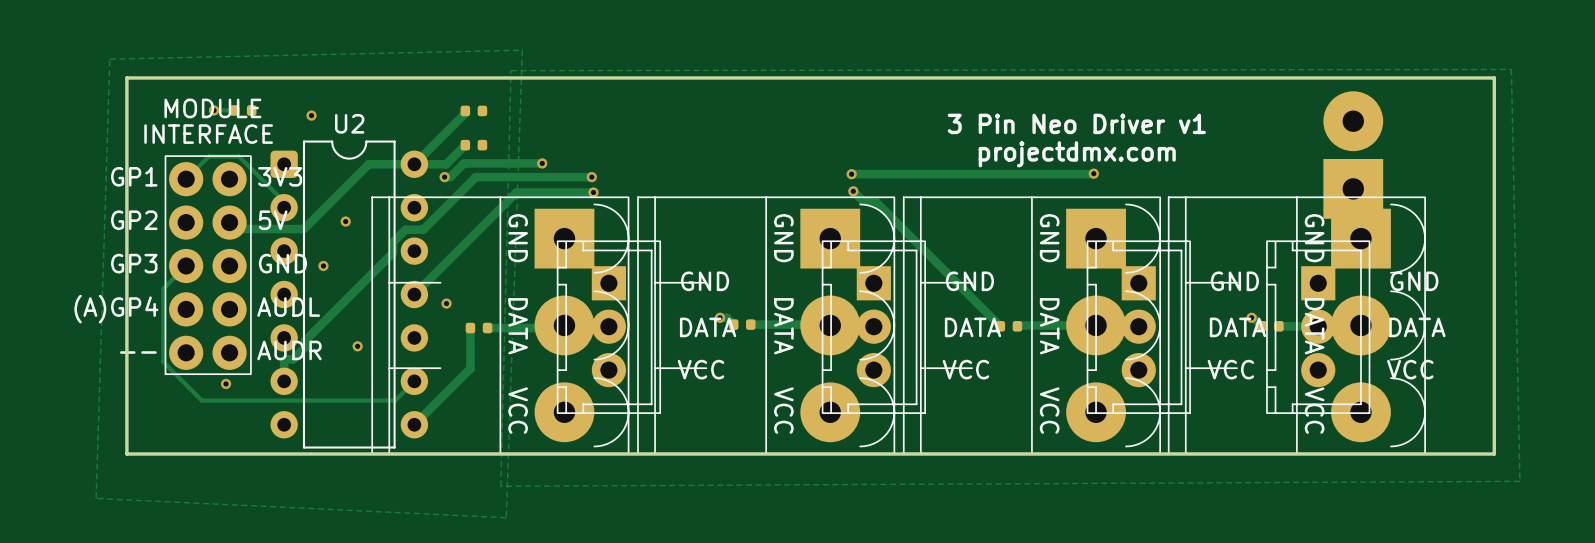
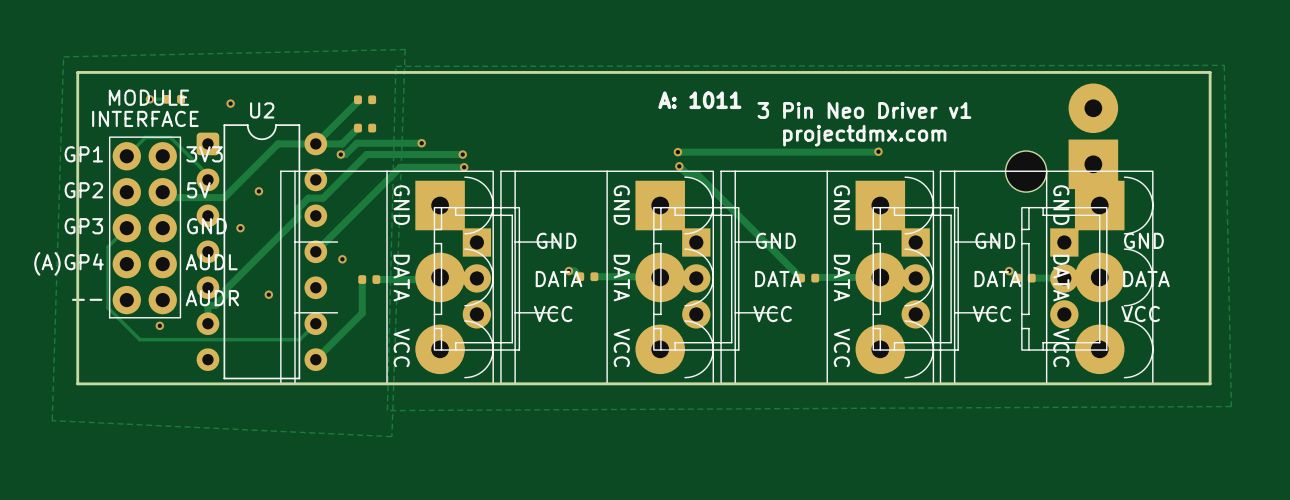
text: none -> A: 1011 (699, 100)
part: none -> (1026, 171)

